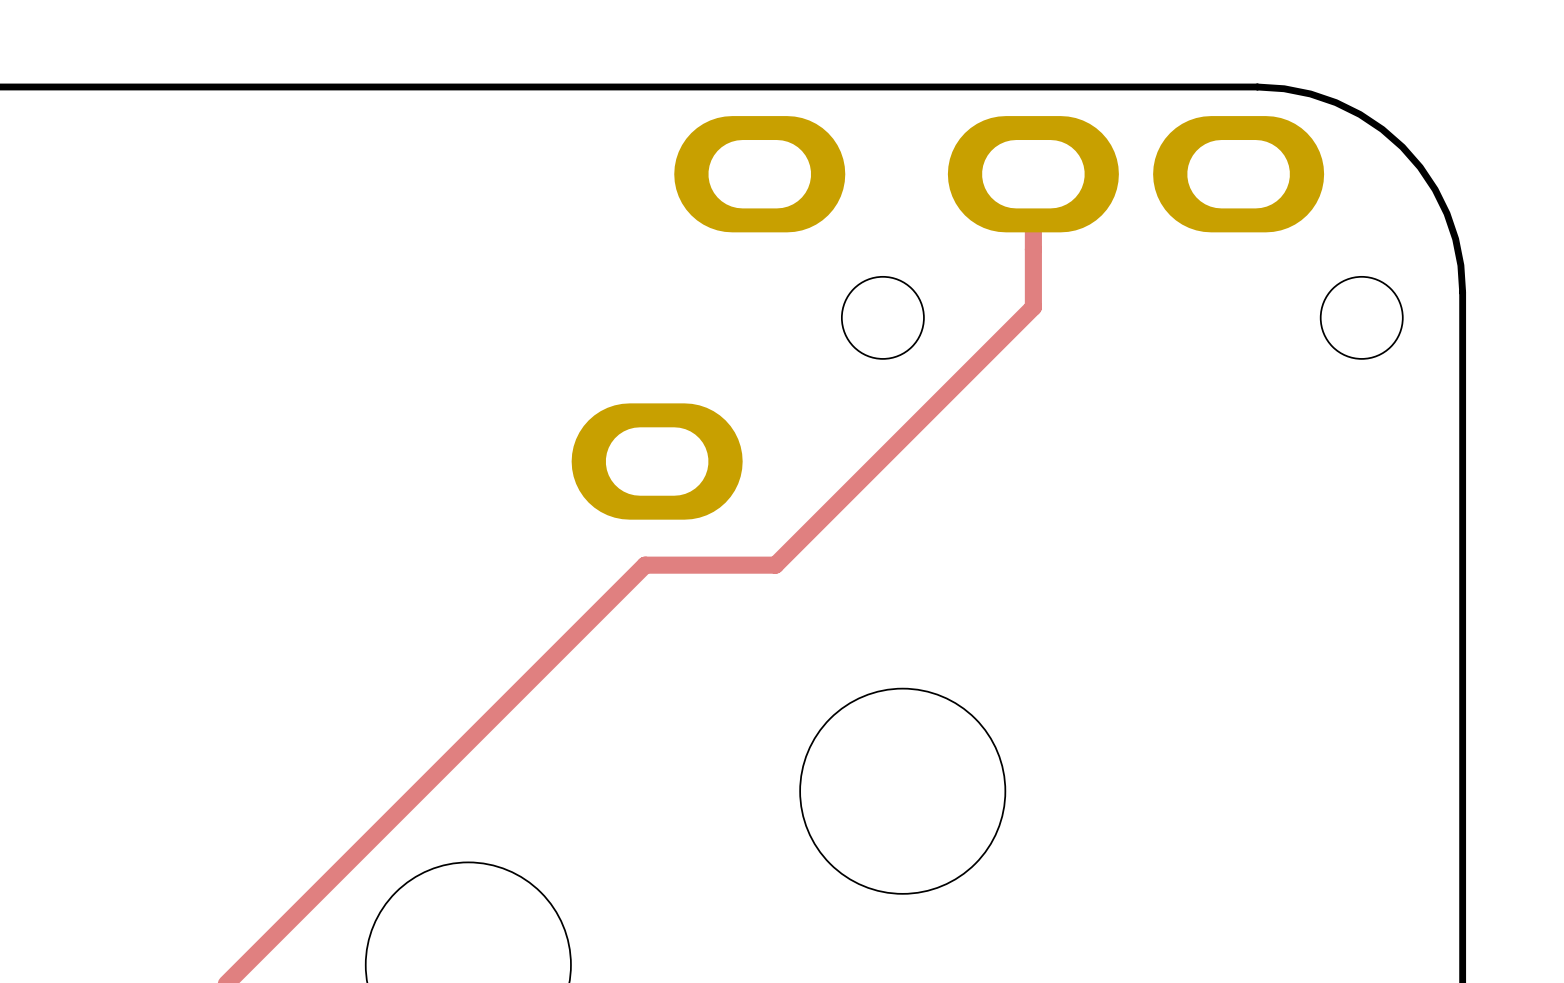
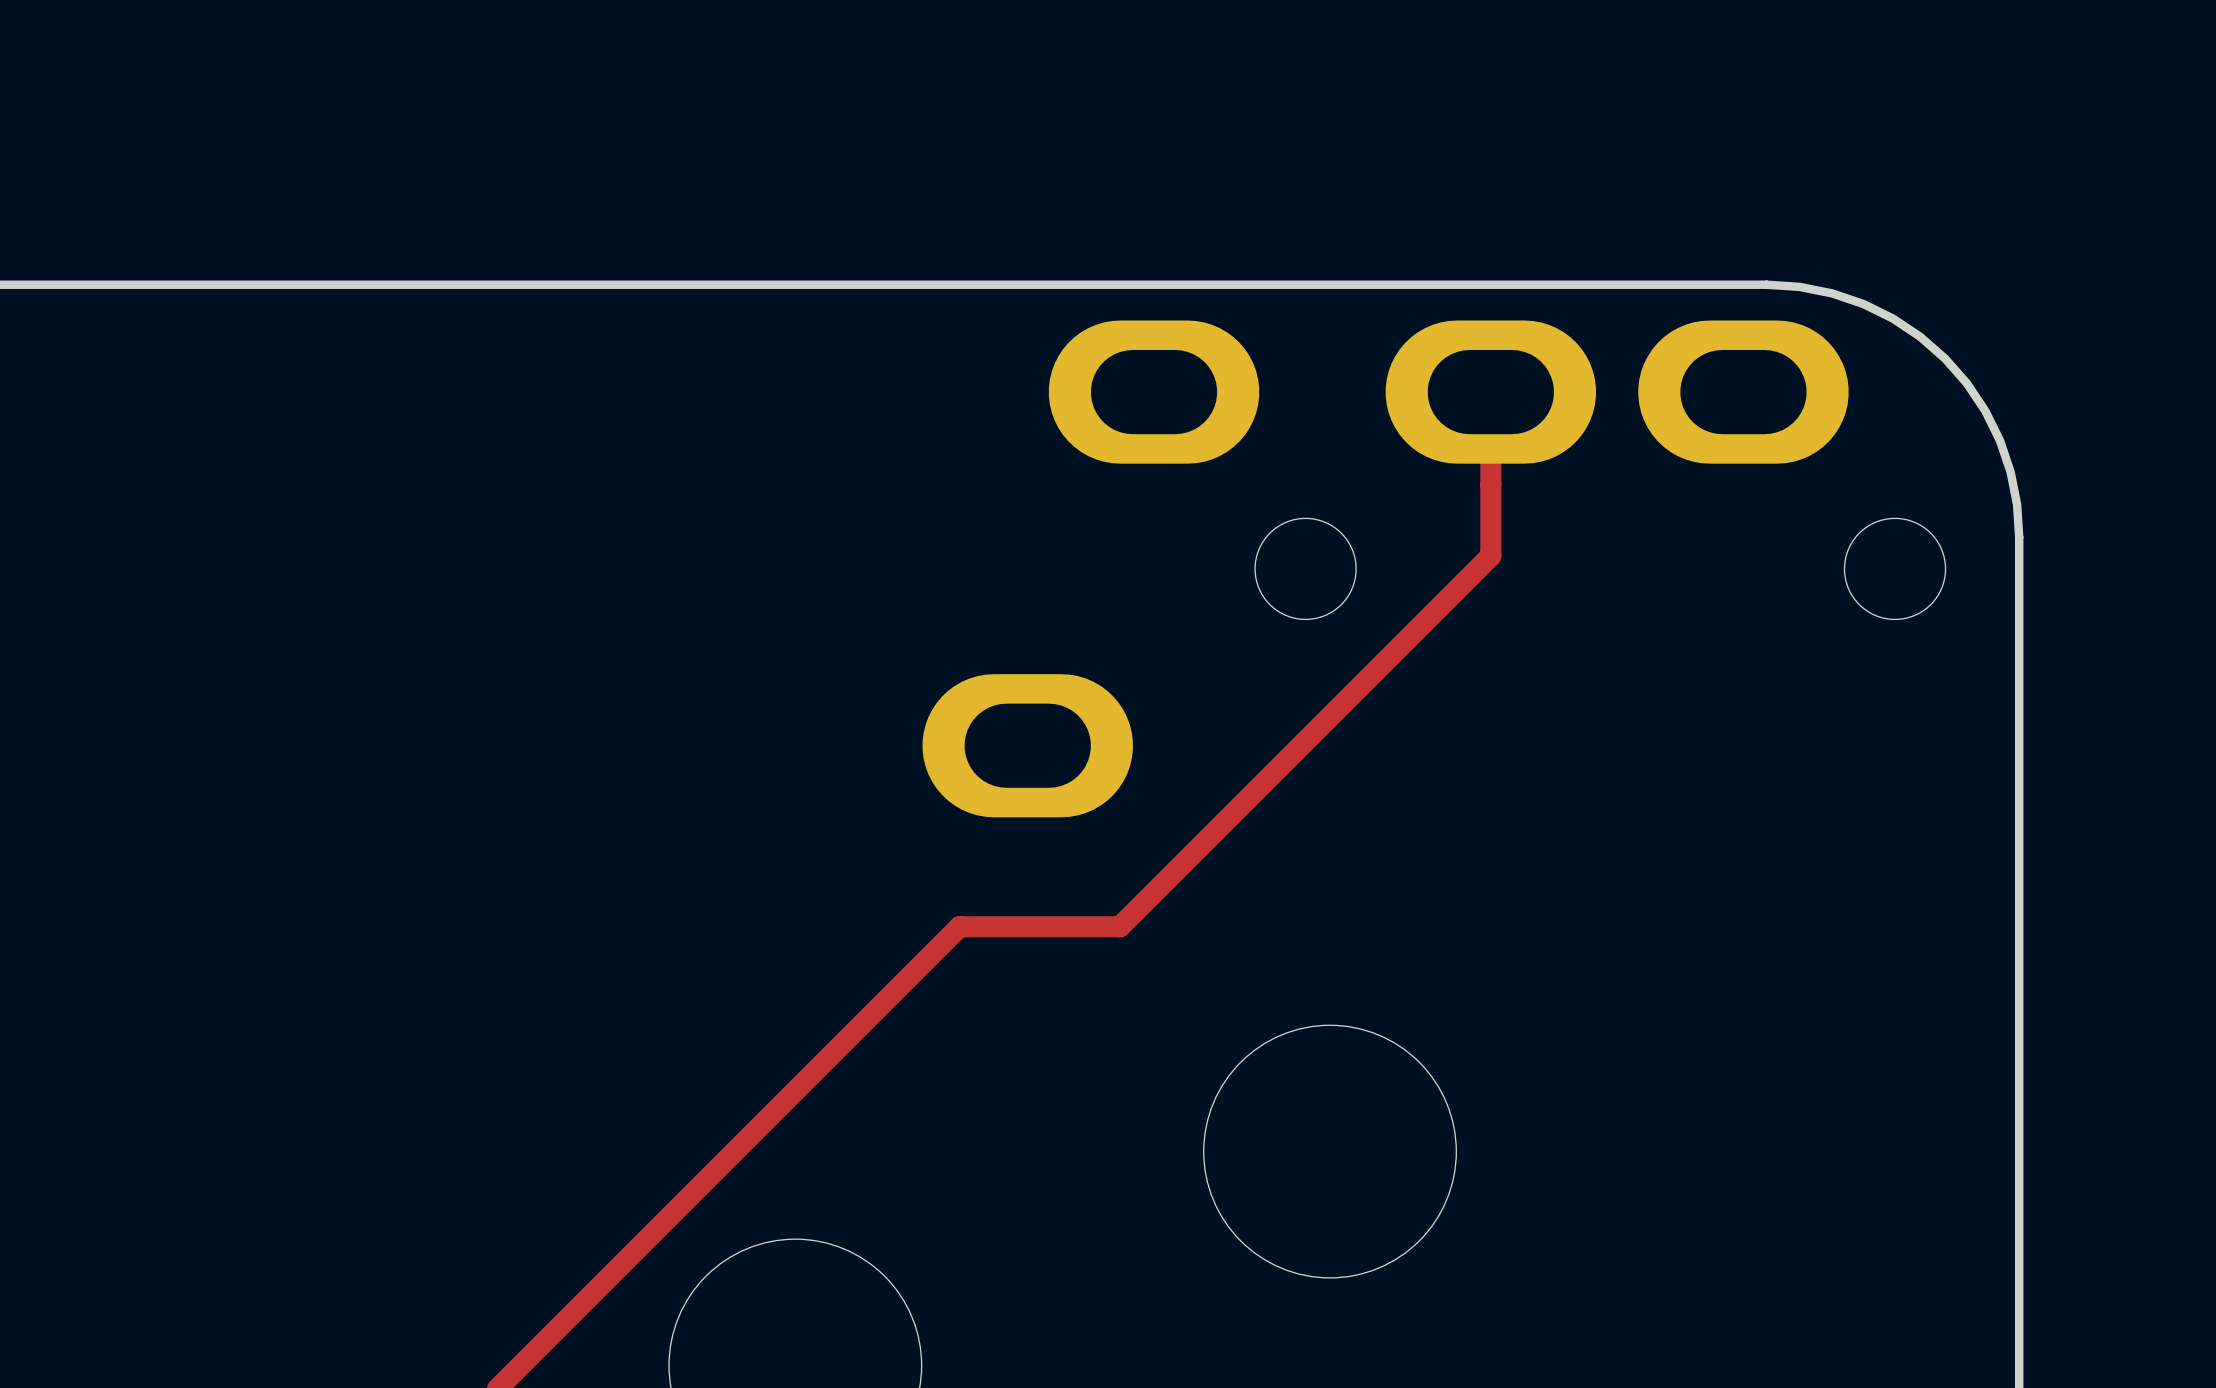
track: (775, 565) (645, 565) (601, 608) -> (1173, 873) (1119, 926) (959, 926)

